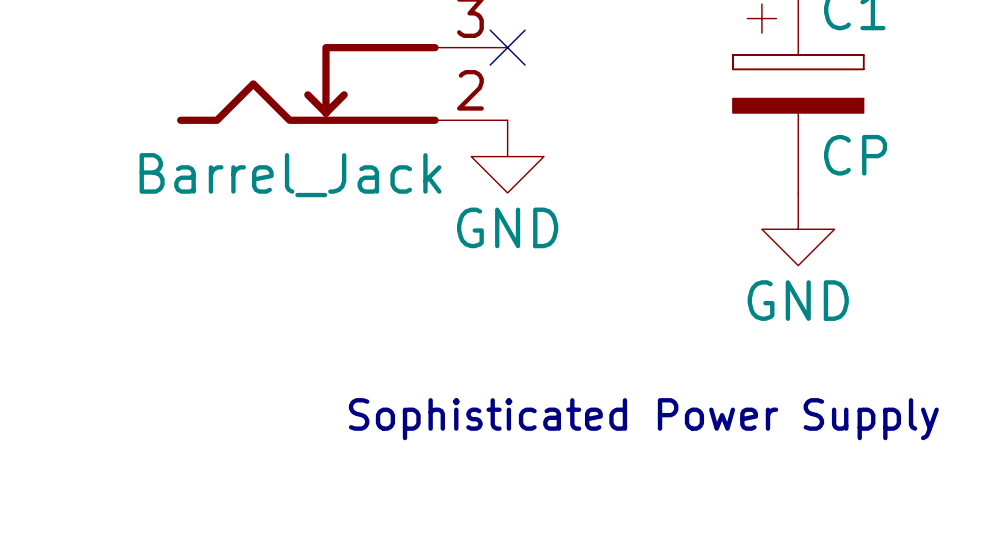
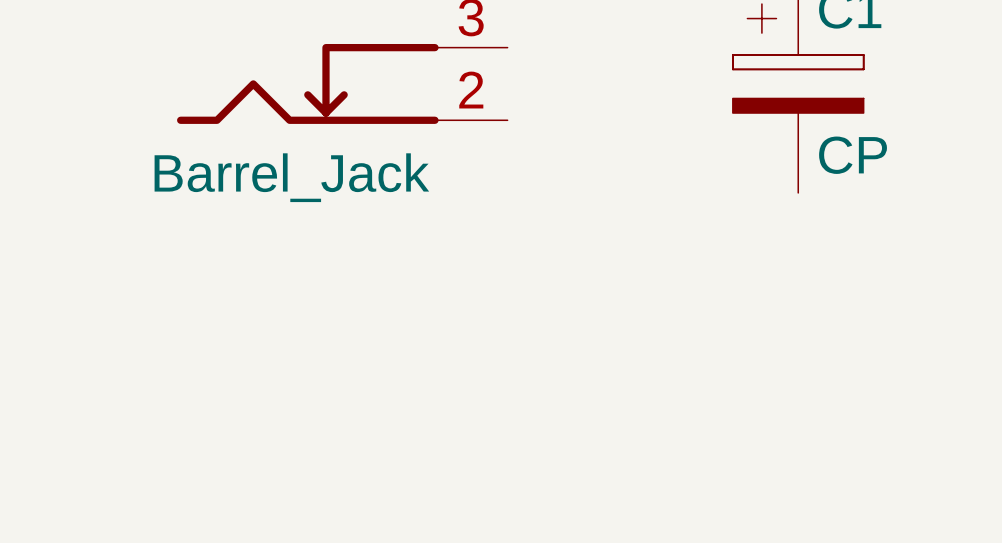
no-connect mark: (507, 47) -> none
power symbol: GND (507, 156) -> none
power symbol: GND (798, 229) -> none
text: Sophisticated Power Supply (643, 419) -> none

